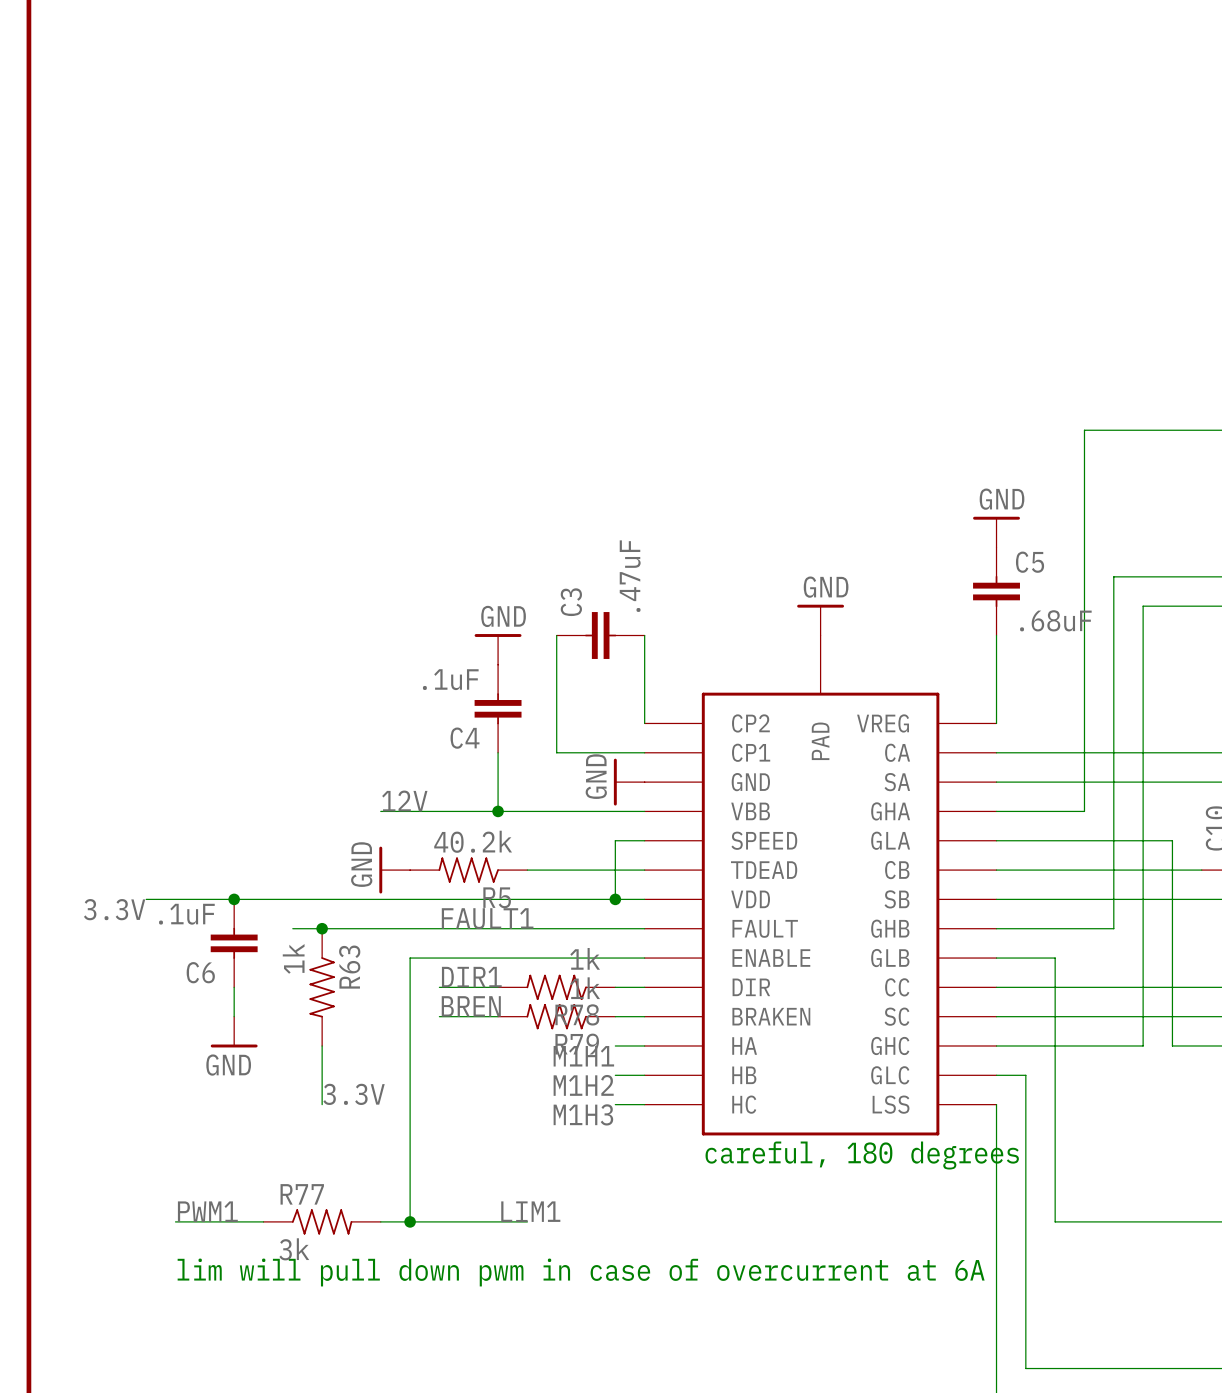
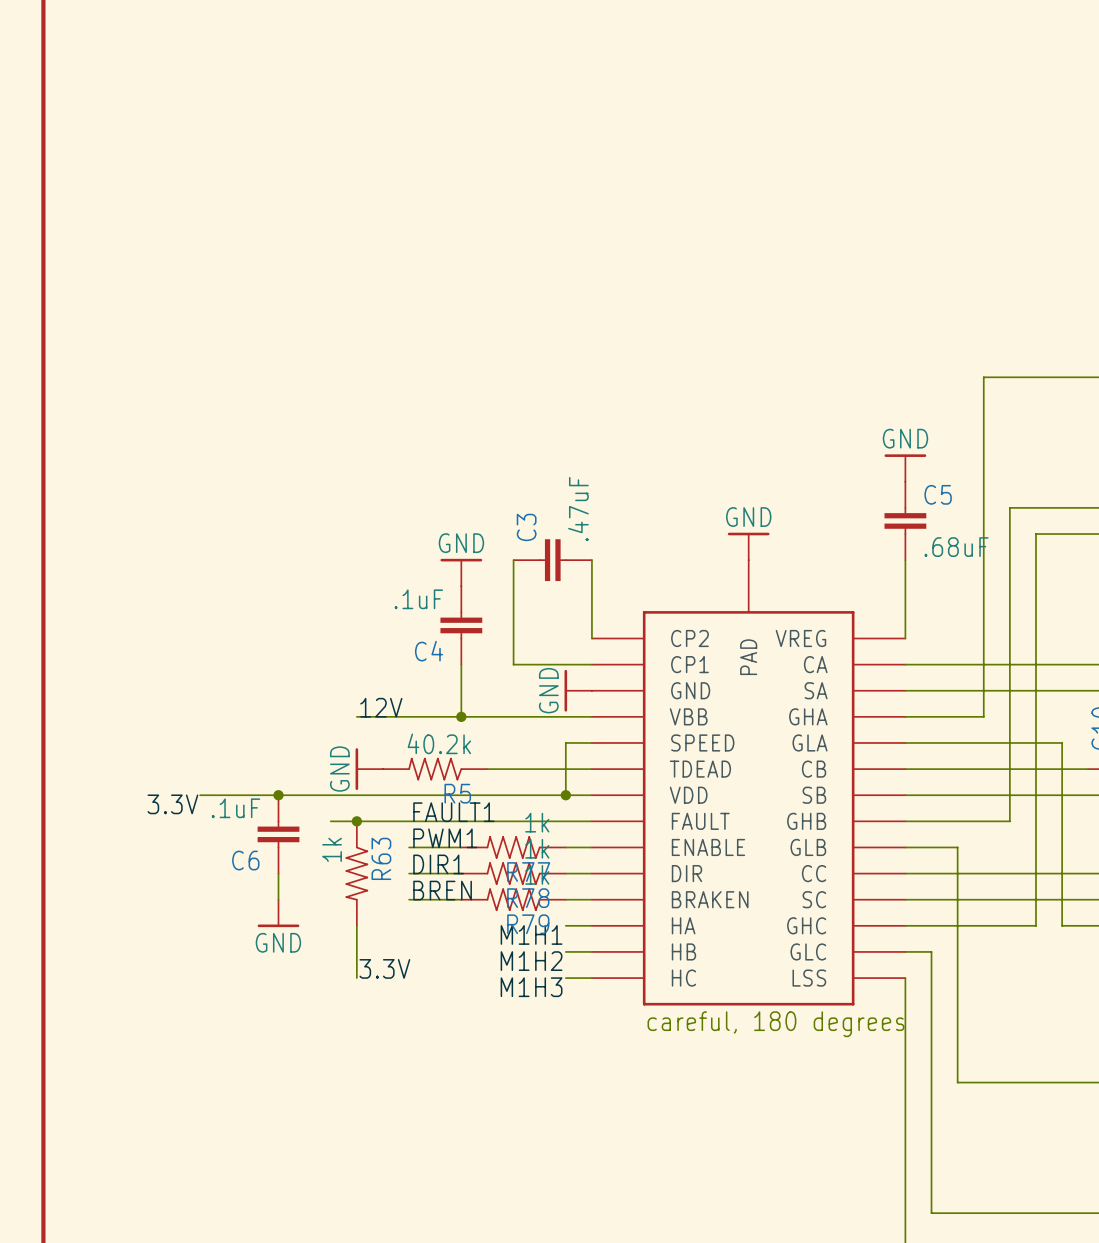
wire: (146, 899) (204, 899) -> none
junction: (234, 899) -> none
junction: none -> (278, 795)
label position: 3.3V (114, 909) -> 3.3V (172, 804)
wire: (292, 928) (351, 928) -> none
junction: (322, 928) -> none
junction: none -> (356, 821)
C6 position: (234, 943) -> (278, 834)
label: none -> PWM1 (445, 838)
wire: (439, 958) (410, 958) (410, 1221) -> none
wire: (234, 987) (234, 1016) -> (278, 873) (278, 899)
R63 position: (322, 987) -> (356, 873)
power symbol position: GND (234, 1032) -> GND (278, 913)
wire: (322, 1045) (322, 1104) -> (356, 925) (356, 978)
label position: 3.3V (354, 1094) -> 3.3V (384, 968)
label: PWM1 (207, 1211) -> none
label: LIM1 (530, 1211) -> none
wire: (175, 1221) (263, 1221) -> none
R77 rotation: 0° (322, 1221) -> 180° (513, 847)
R77 position: (322, 1221) -> (513, 847)
wire: (380, 1221) (527, 1221) -> none
junction: (410, 1221) -> none
R77 value: 3k (294, 1249) -> 1k (537, 822)
text: lim will pull down pwm in case of overcurrent at 6A (581, 1272) -> none

